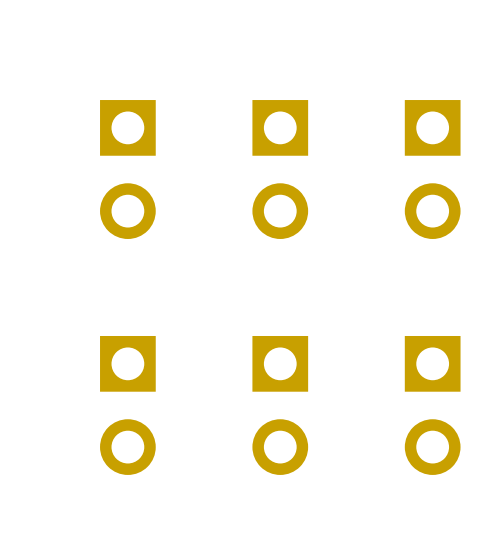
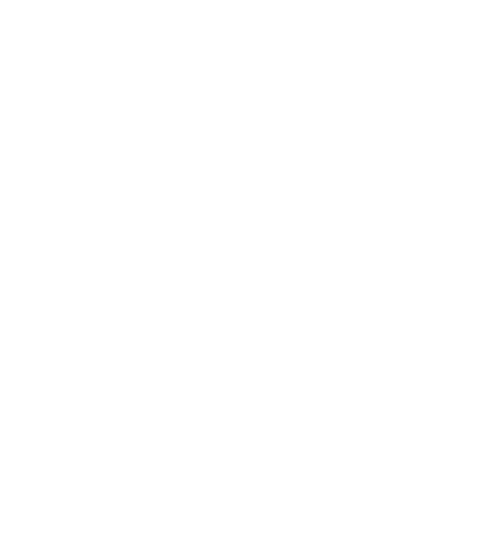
part: (127, 169) -> none
part: (280, 169) -> none
part: (432, 169) -> none
part: (127, 405) -> none
part: (280, 405) -> none
part: (432, 405) -> none

